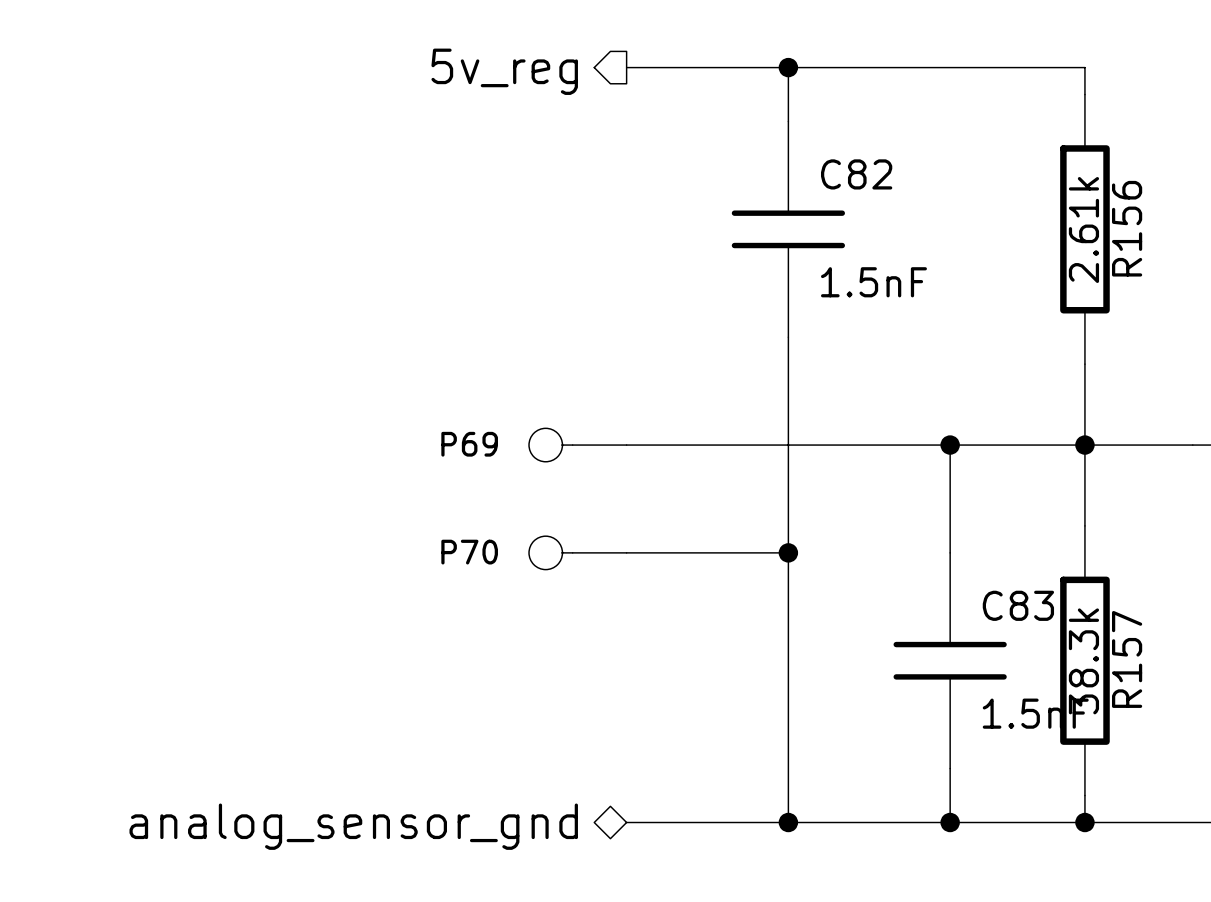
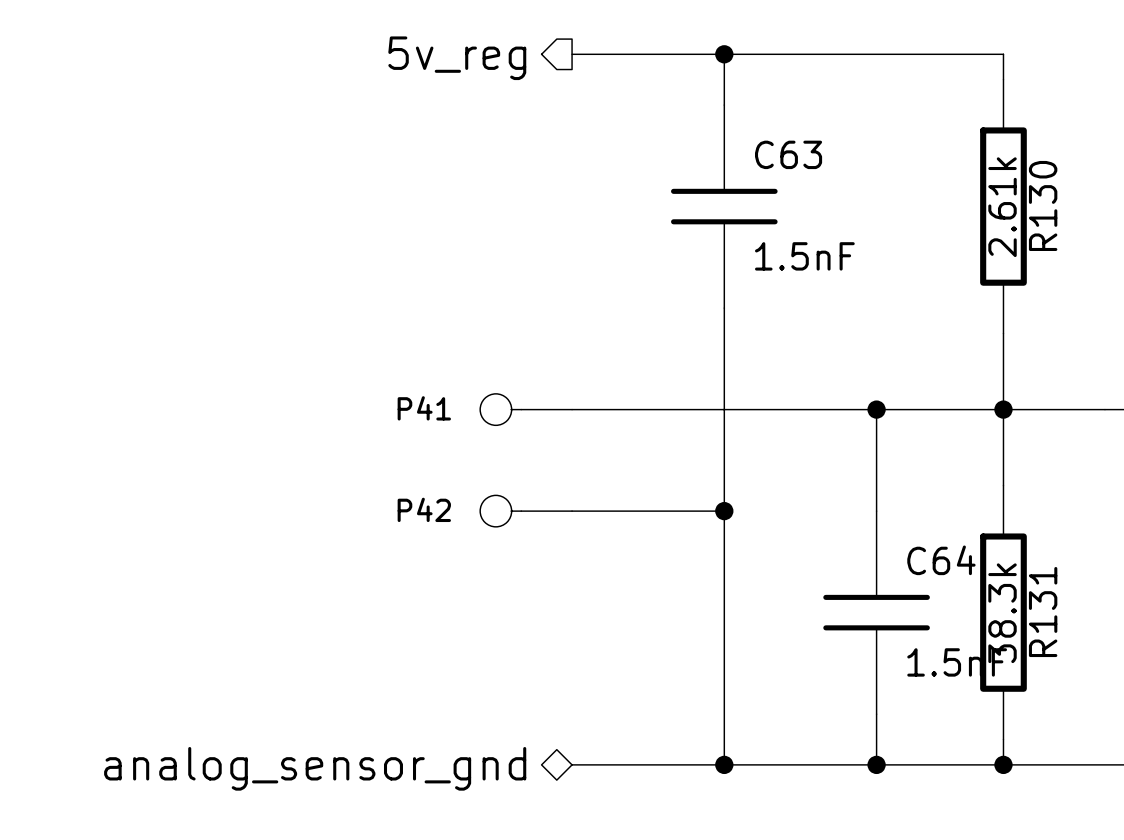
C82 name: C82 (856, 174) -> C63 (788, 154)
R156 name: R156 (1127, 228) -> R130 (1043, 205)
P69 name: P69 (469, 444) -> P41 (424, 408)
P70 name: P70 (469, 552) -> P42 (424, 509)
C83 name: C83 (1018, 605) -> C64 (941, 560)
R157 name: R157 (1127, 659) -> R131 (1043, 612)

